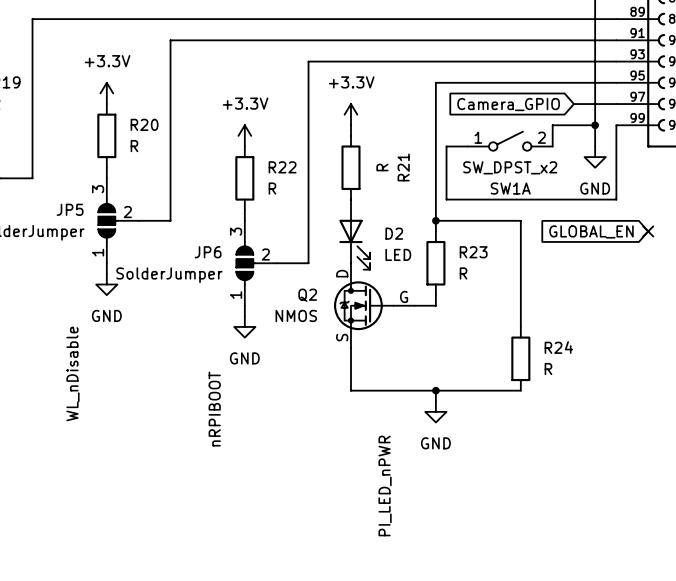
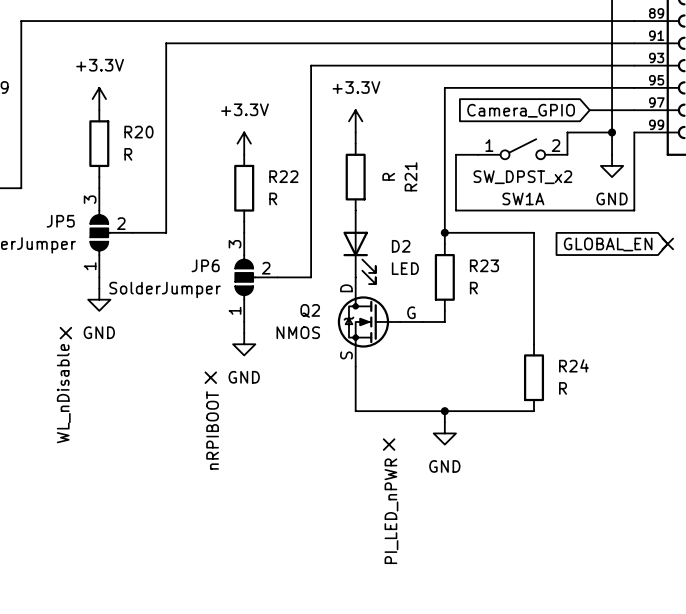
no-connect mark: none -> (65, 333)
no-connect mark: none -> (210, 377)
no-connect mark: none -> (389, 444)

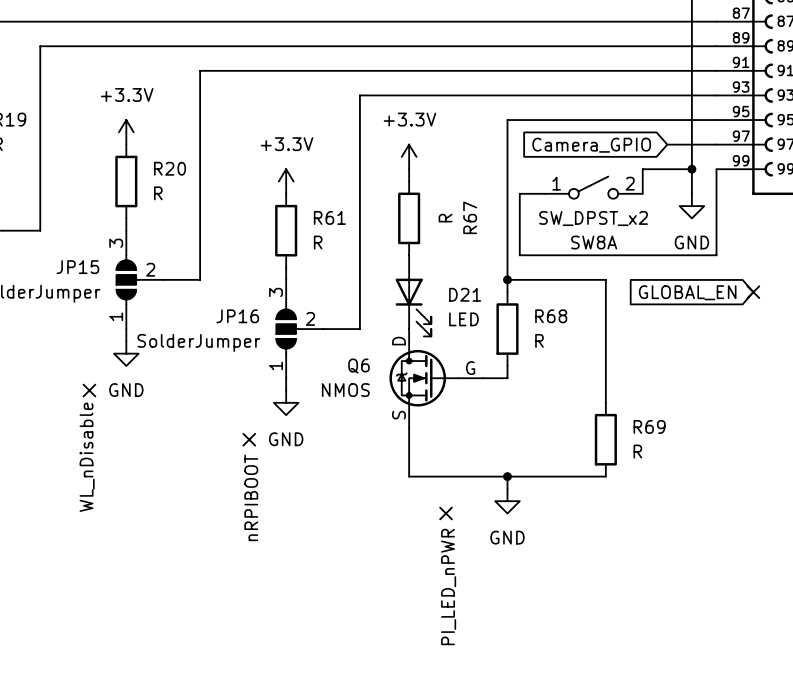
R22 name: R22 (283, 176) -> R61 (329, 217)
R21 name: R21 (410, 176) -> R67 (470, 217)
SW1A name: SW1A (523, 198) -> SW8A (594, 242)
JP5 name: JP5 (60, 221) -> JP15 (77, 267)
D2 name: D2 (401, 246) -> D21 (465, 294)
JP6 name: JP6 (205, 265) -> JP16 (237, 316)
R23 name: R23 (484, 265) -> R68 (551, 316)
Q2 name: Q2 (310, 310) -> Q6 (358, 366)
R24 name: R24 (573, 365) -> R69 (649, 426)

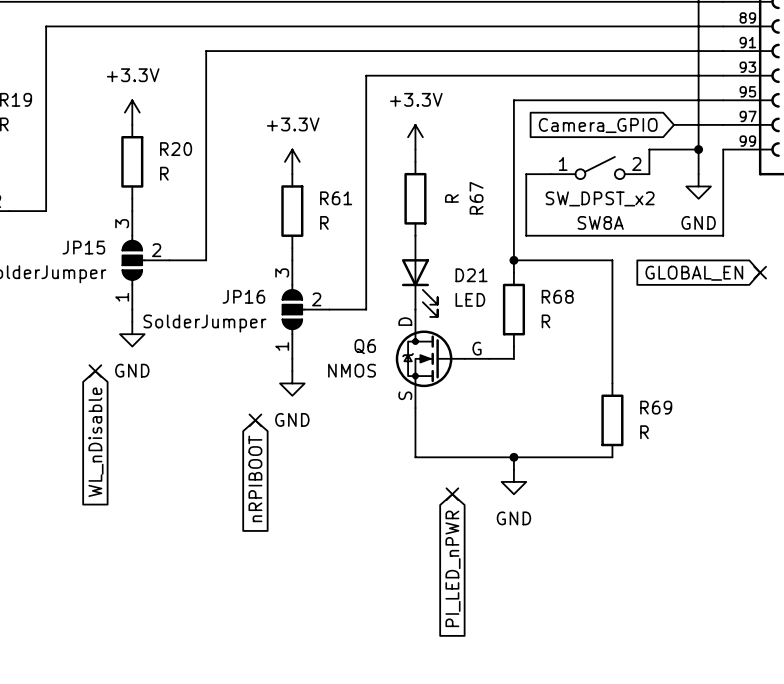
text: WL_nDisable (87, 457) -> none
global label: none -> WL_nDisable (95, 442)
text: nRPIBOOT (251, 497) -> none
global label: none -> nRPIBOOT (255, 478)
text: PI_LED_nPWR (448, 587) -> none
global label: none -> PI_LED_nPWR (452, 568)

